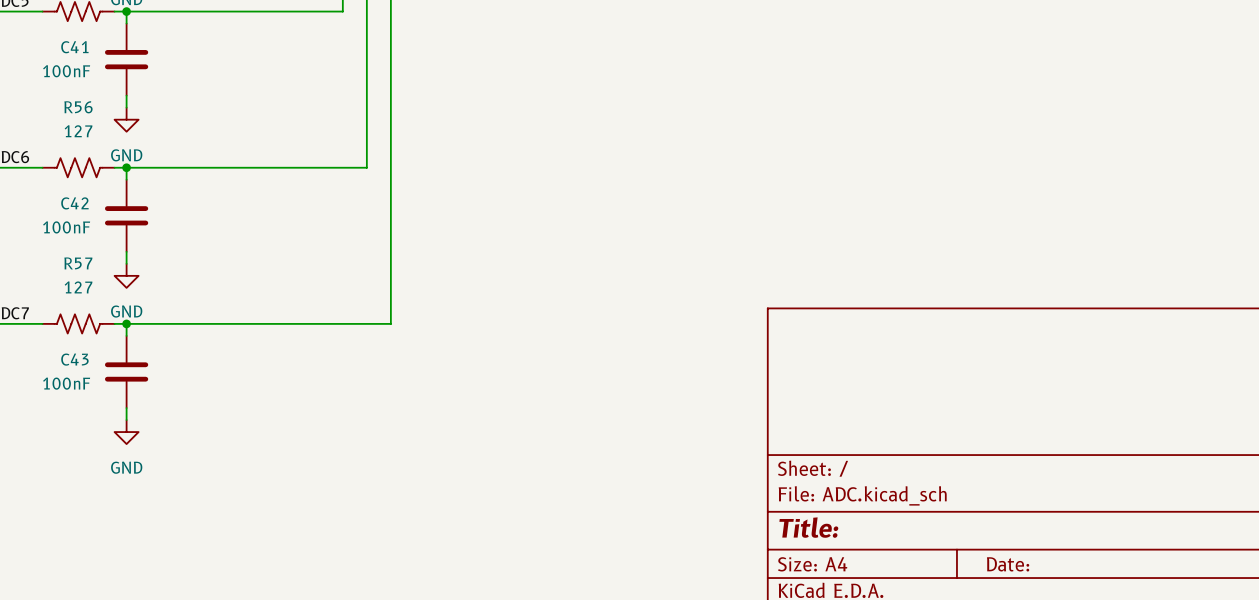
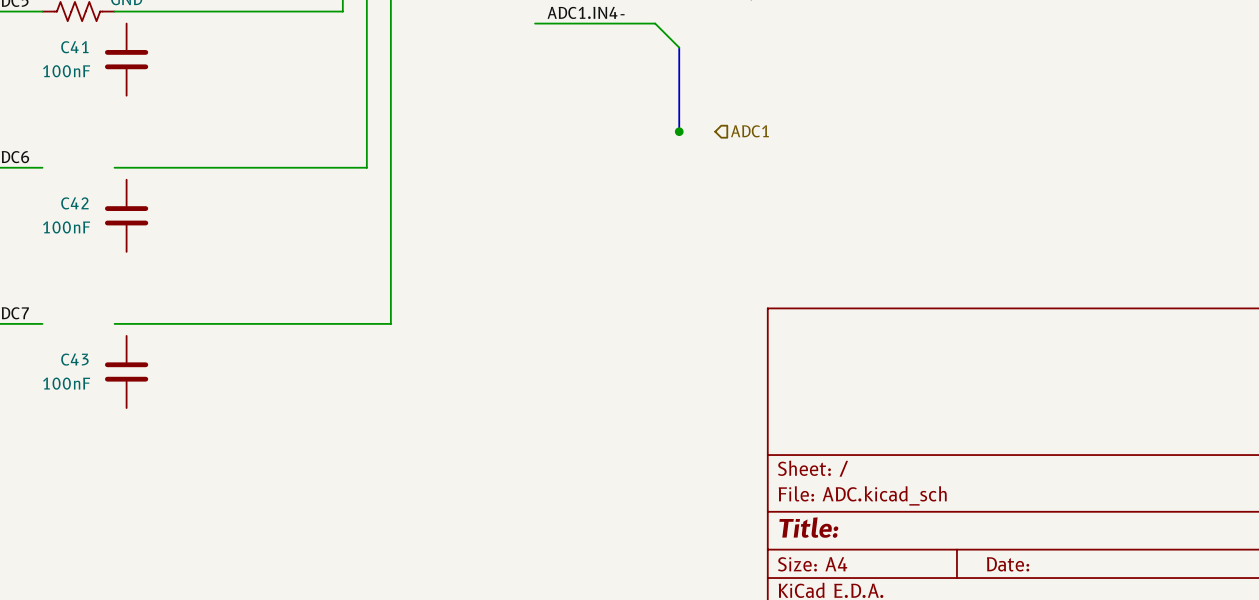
wire: (126, 11) (126, 23) -> none
junction: (126, 11) -> none
label: none -> ADC1.IN4- (586, 12)
wire: none -> (535, 23) (655, 23) (679, 47)
bus: none -> (679, 47) (679, 131)
wire: (126, 95) (126, 107) -> none
power symbol: GND (126, 119) -> none
junction: none -> (679, 131)
hierarchical label: none -> ADC1 (749, 131)
R56: 127 (78, 167) -> none
wire: (126, 167) (126, 179) -> none
junction: (126, 167) -> none
wire: (126, 251) (126, 263) -> none
power symbol: GND (126, 275) -> none
R57: 127 (78, 323) -> none
wire: (126, 323) (126, 335) -> none
junction: (126, 323) -> none
wire: (126, 408) (126, 420) -> none
power symbol: GND (126, 432) -> none

